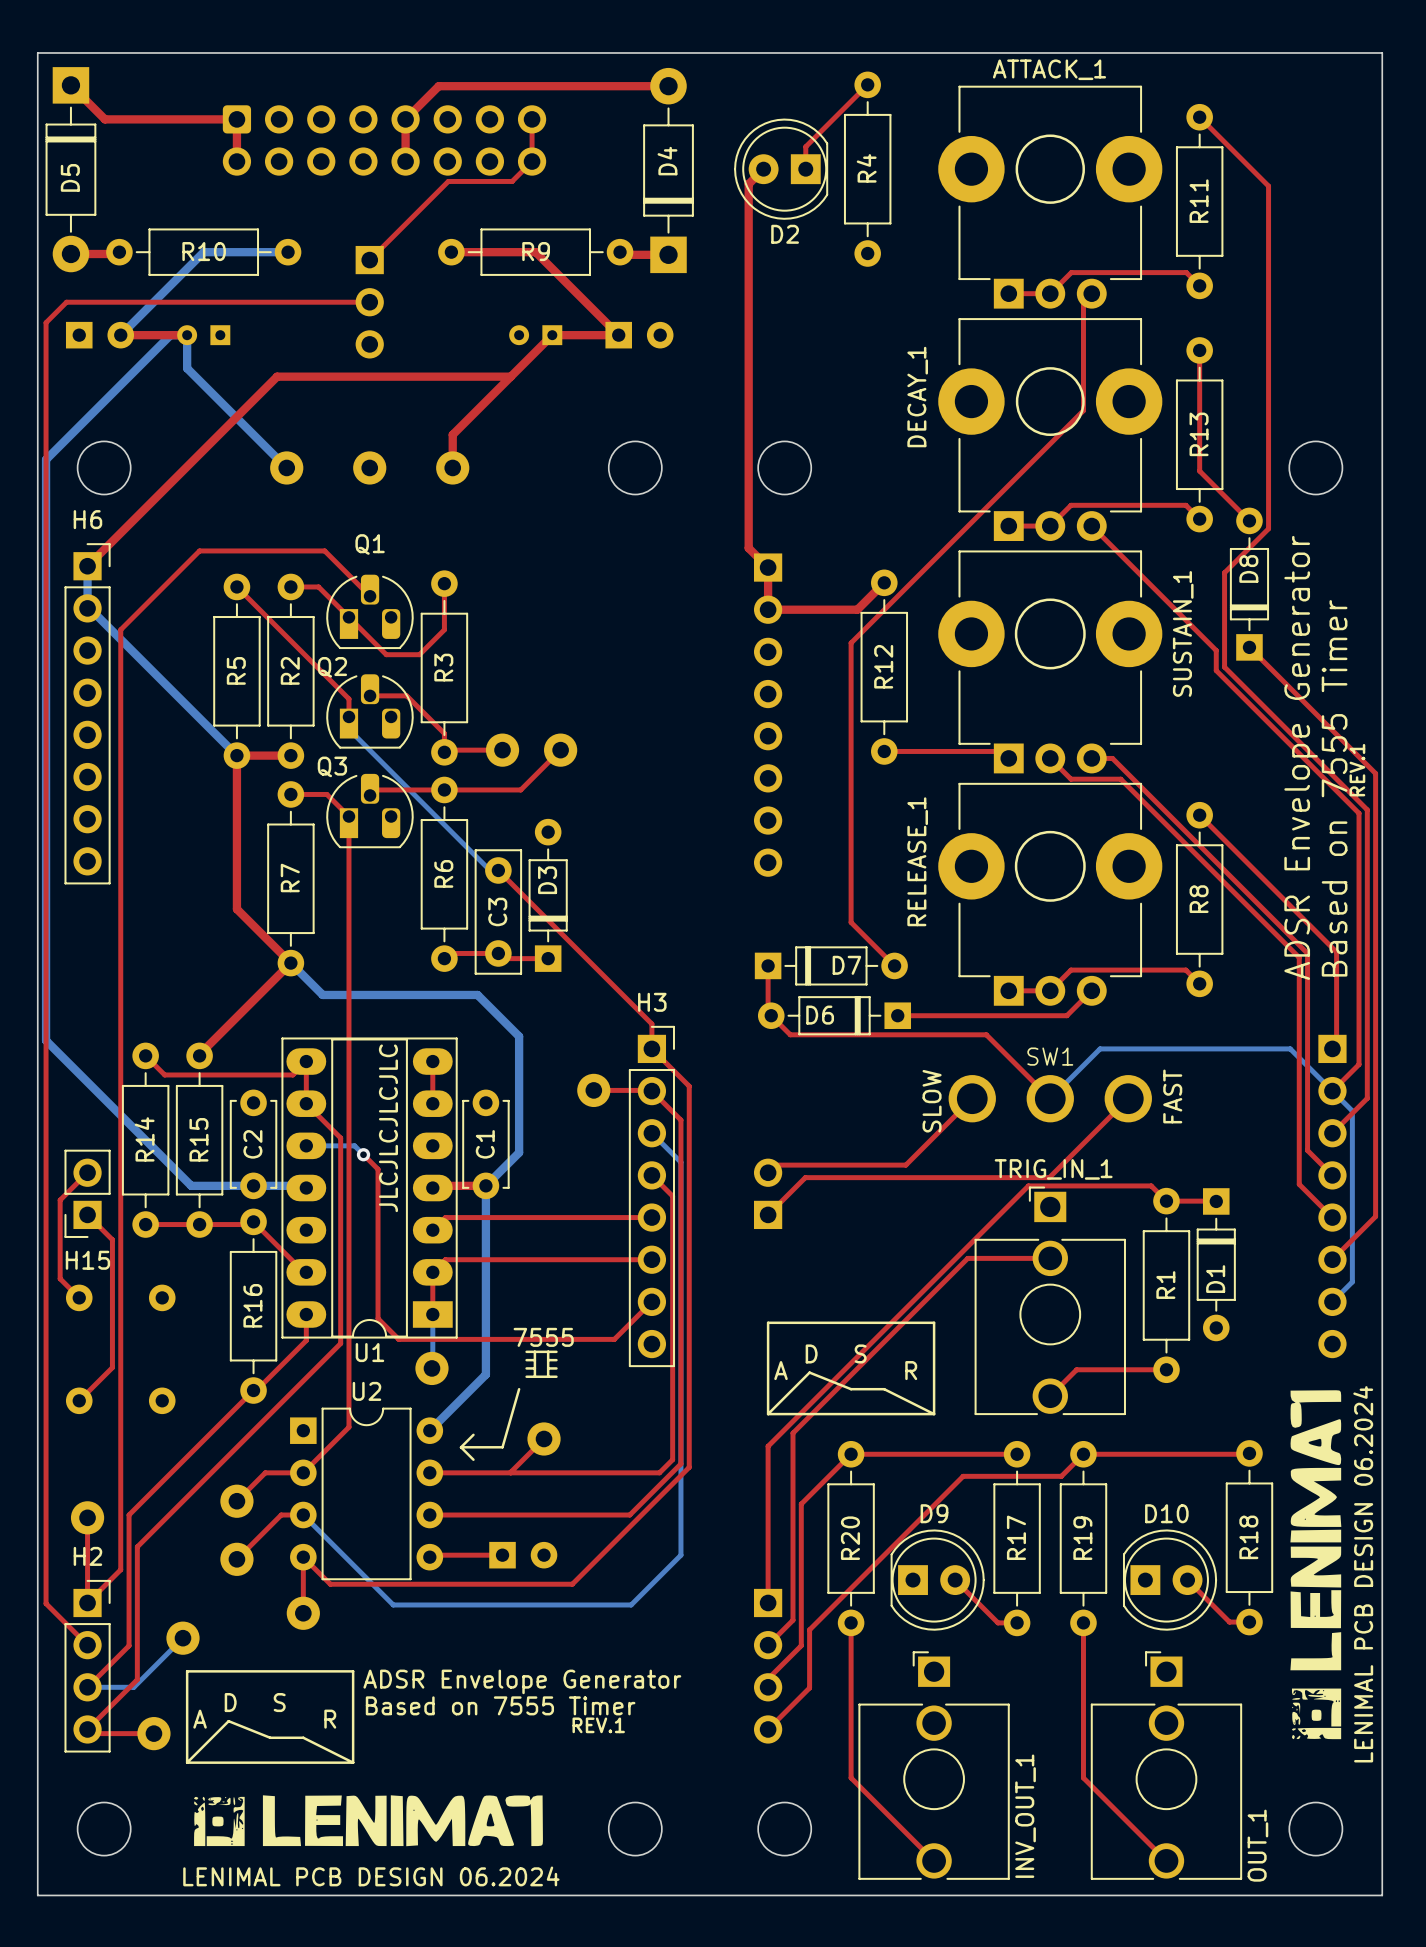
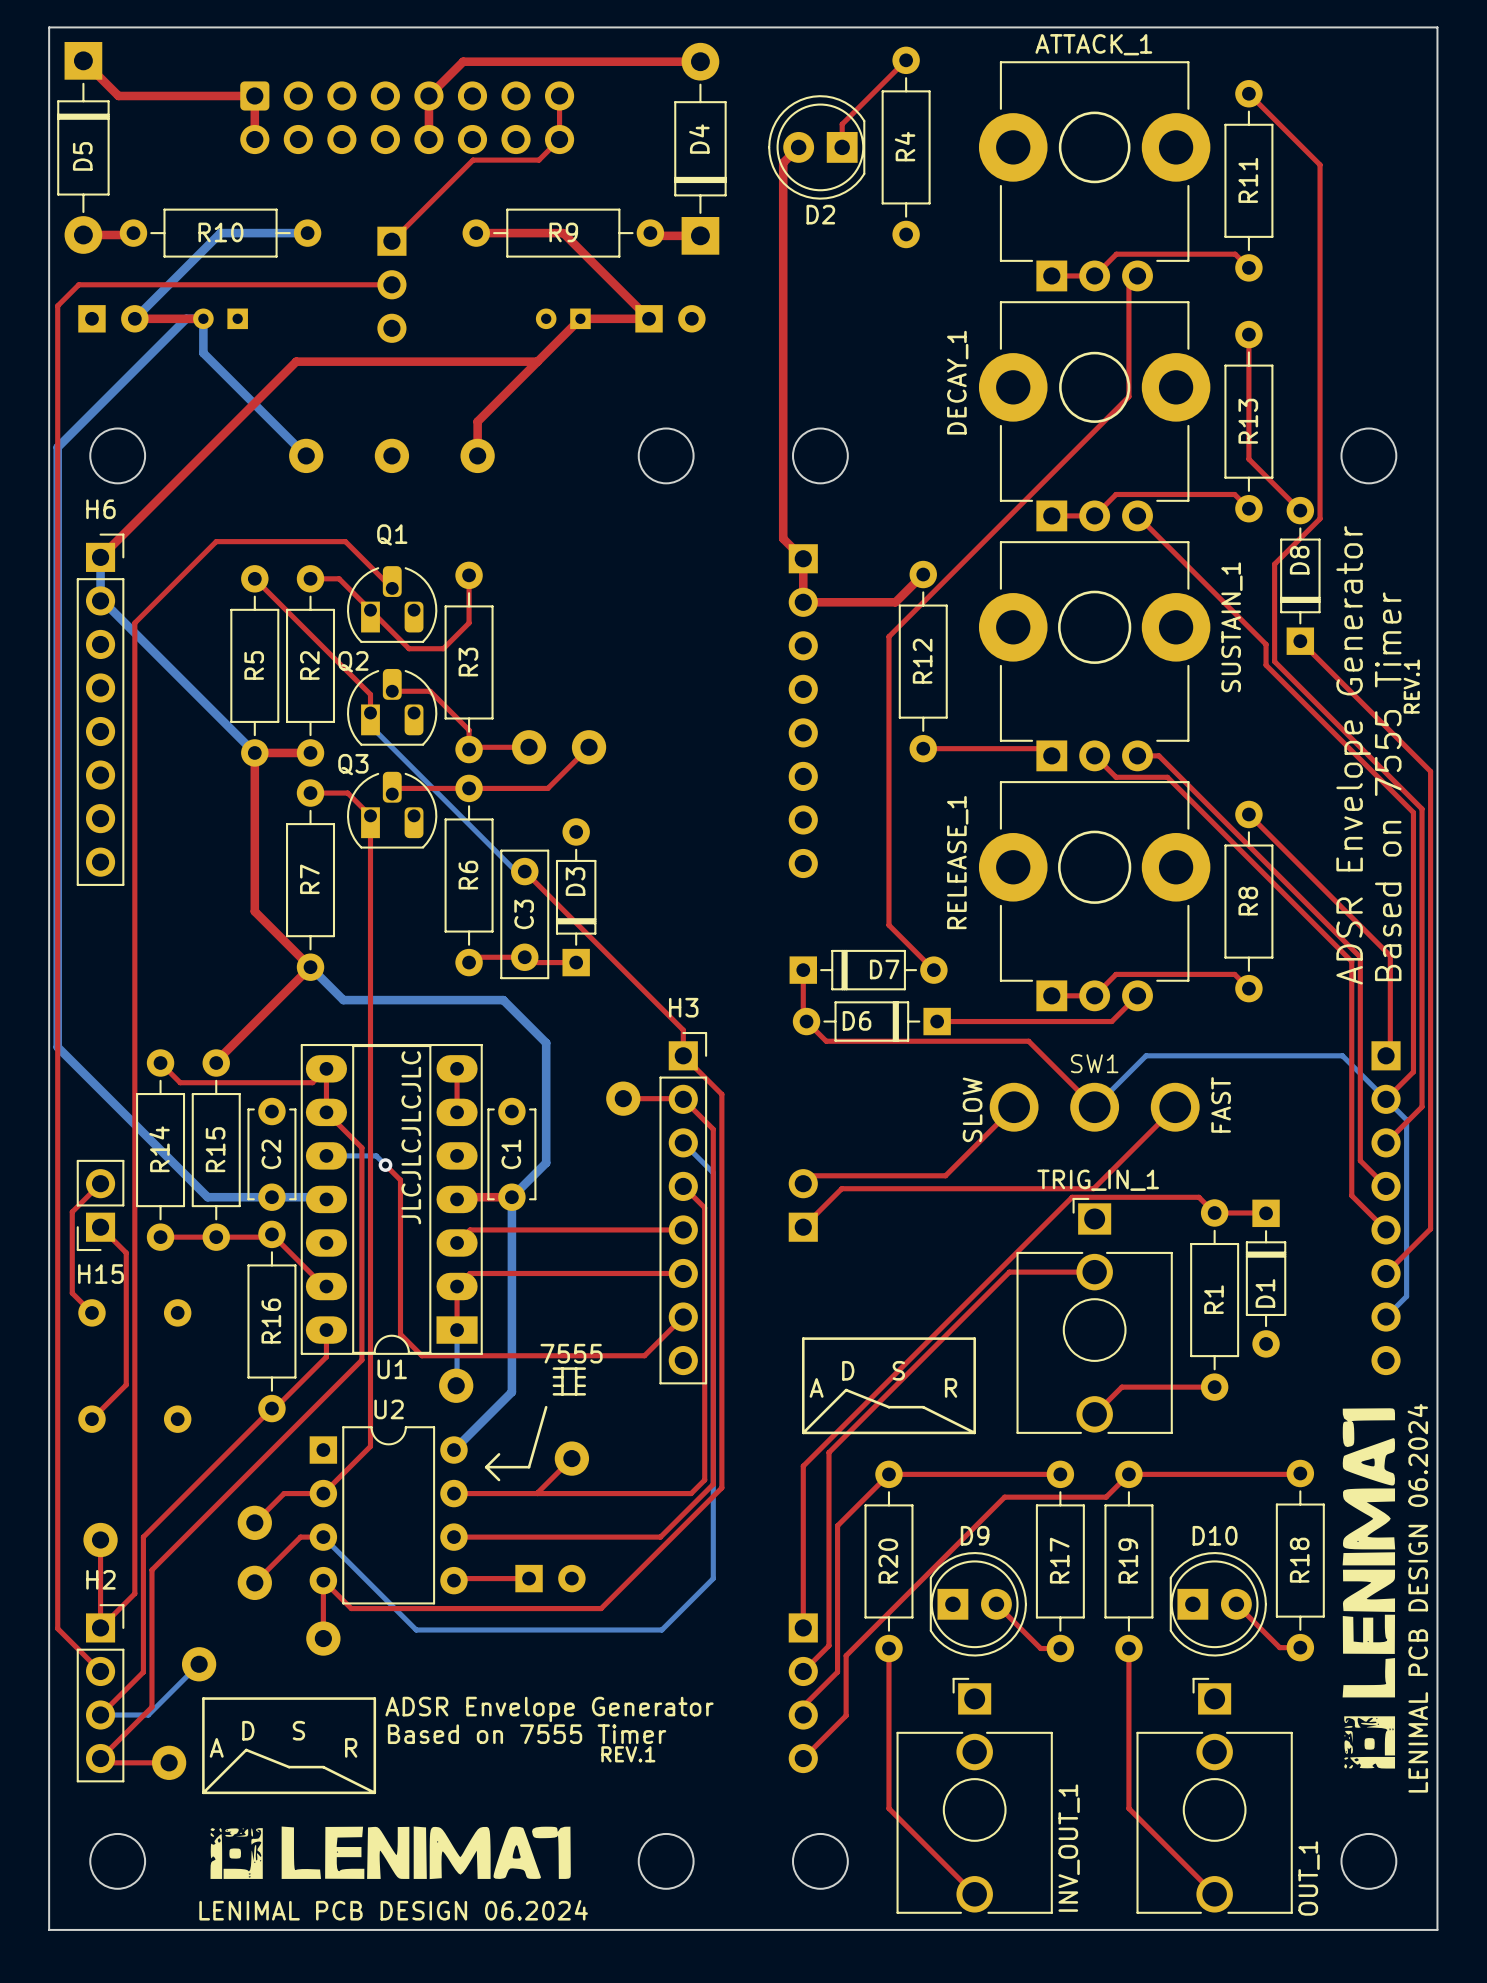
text position: REV.1 (1357, 770) -> REV.1 (1411, 686)

